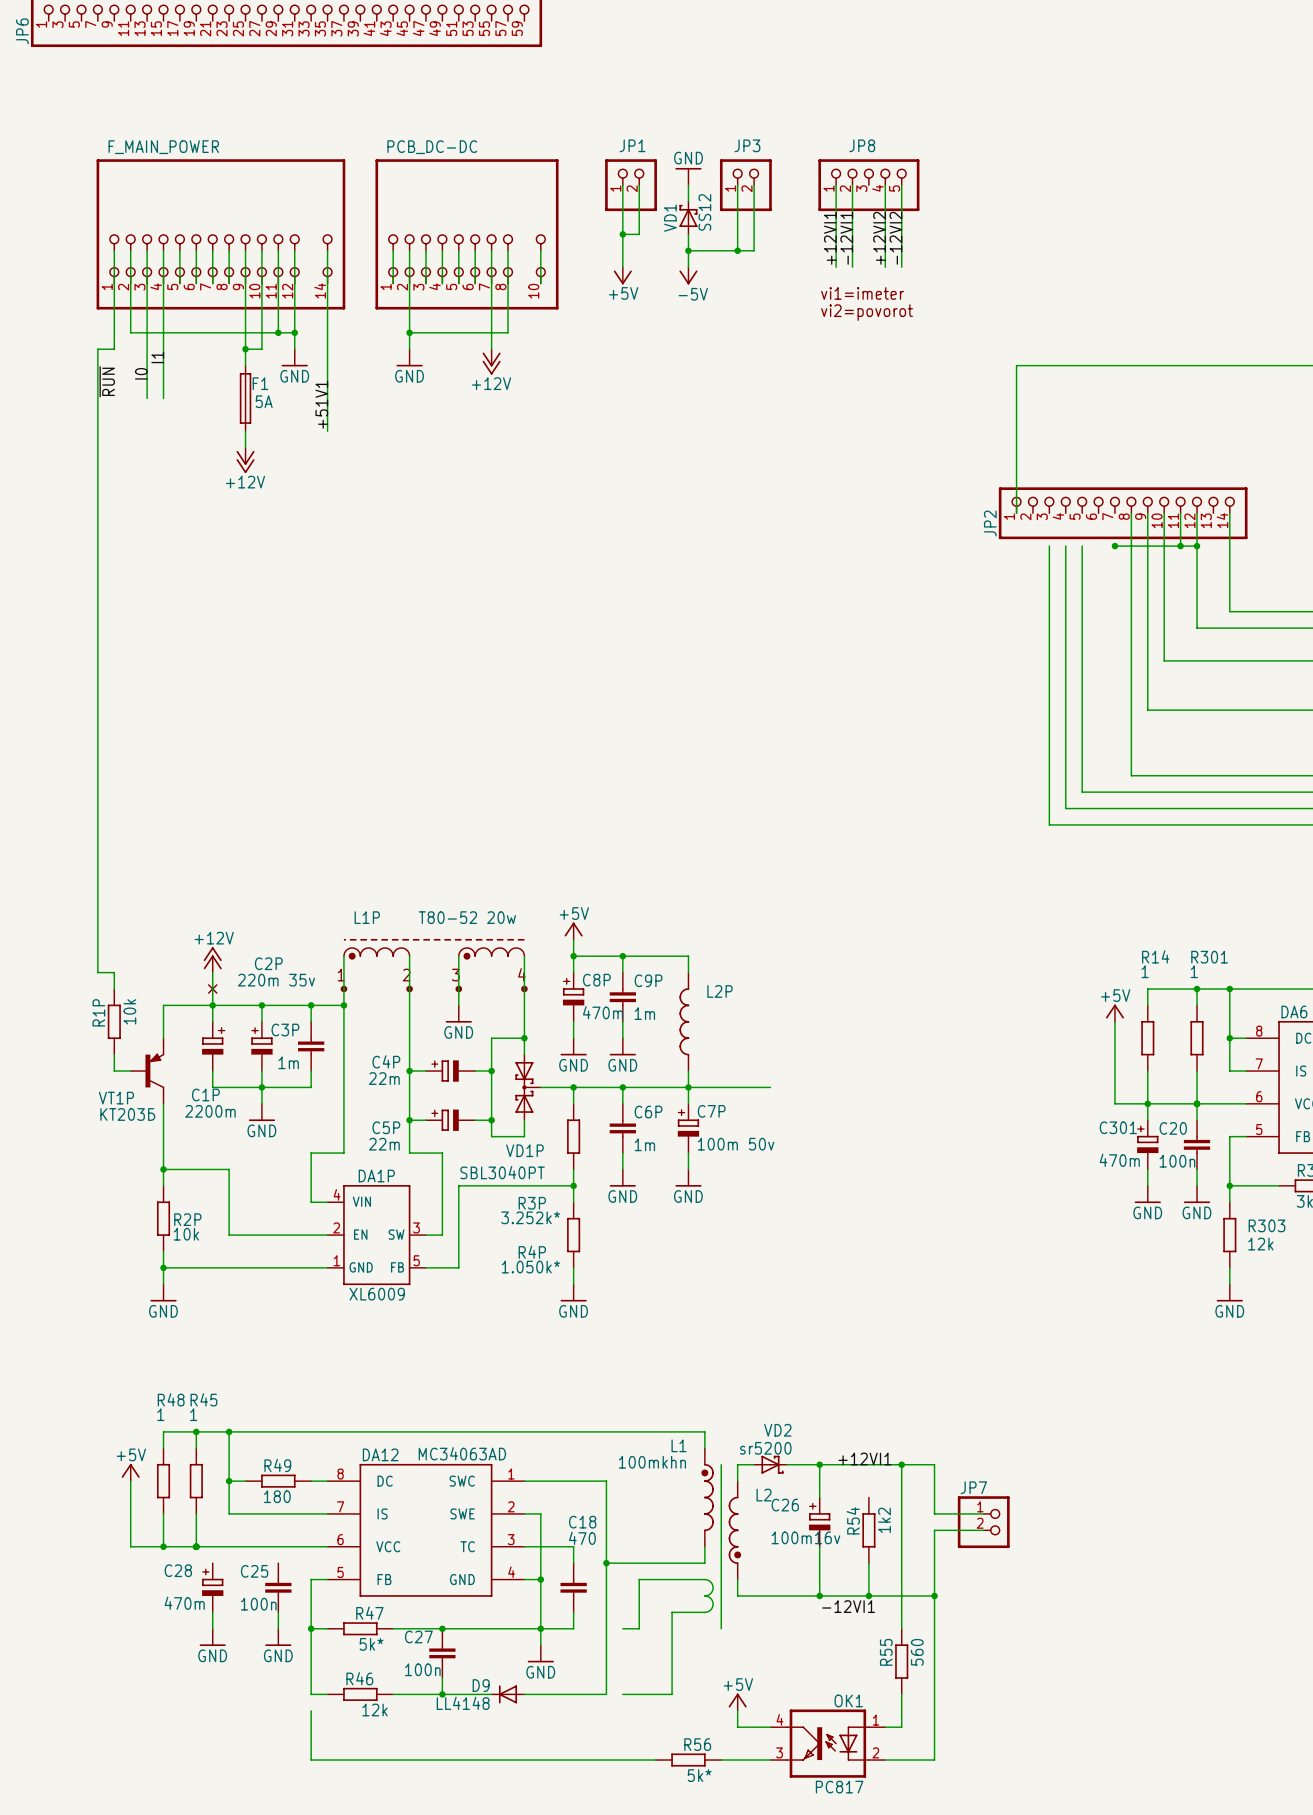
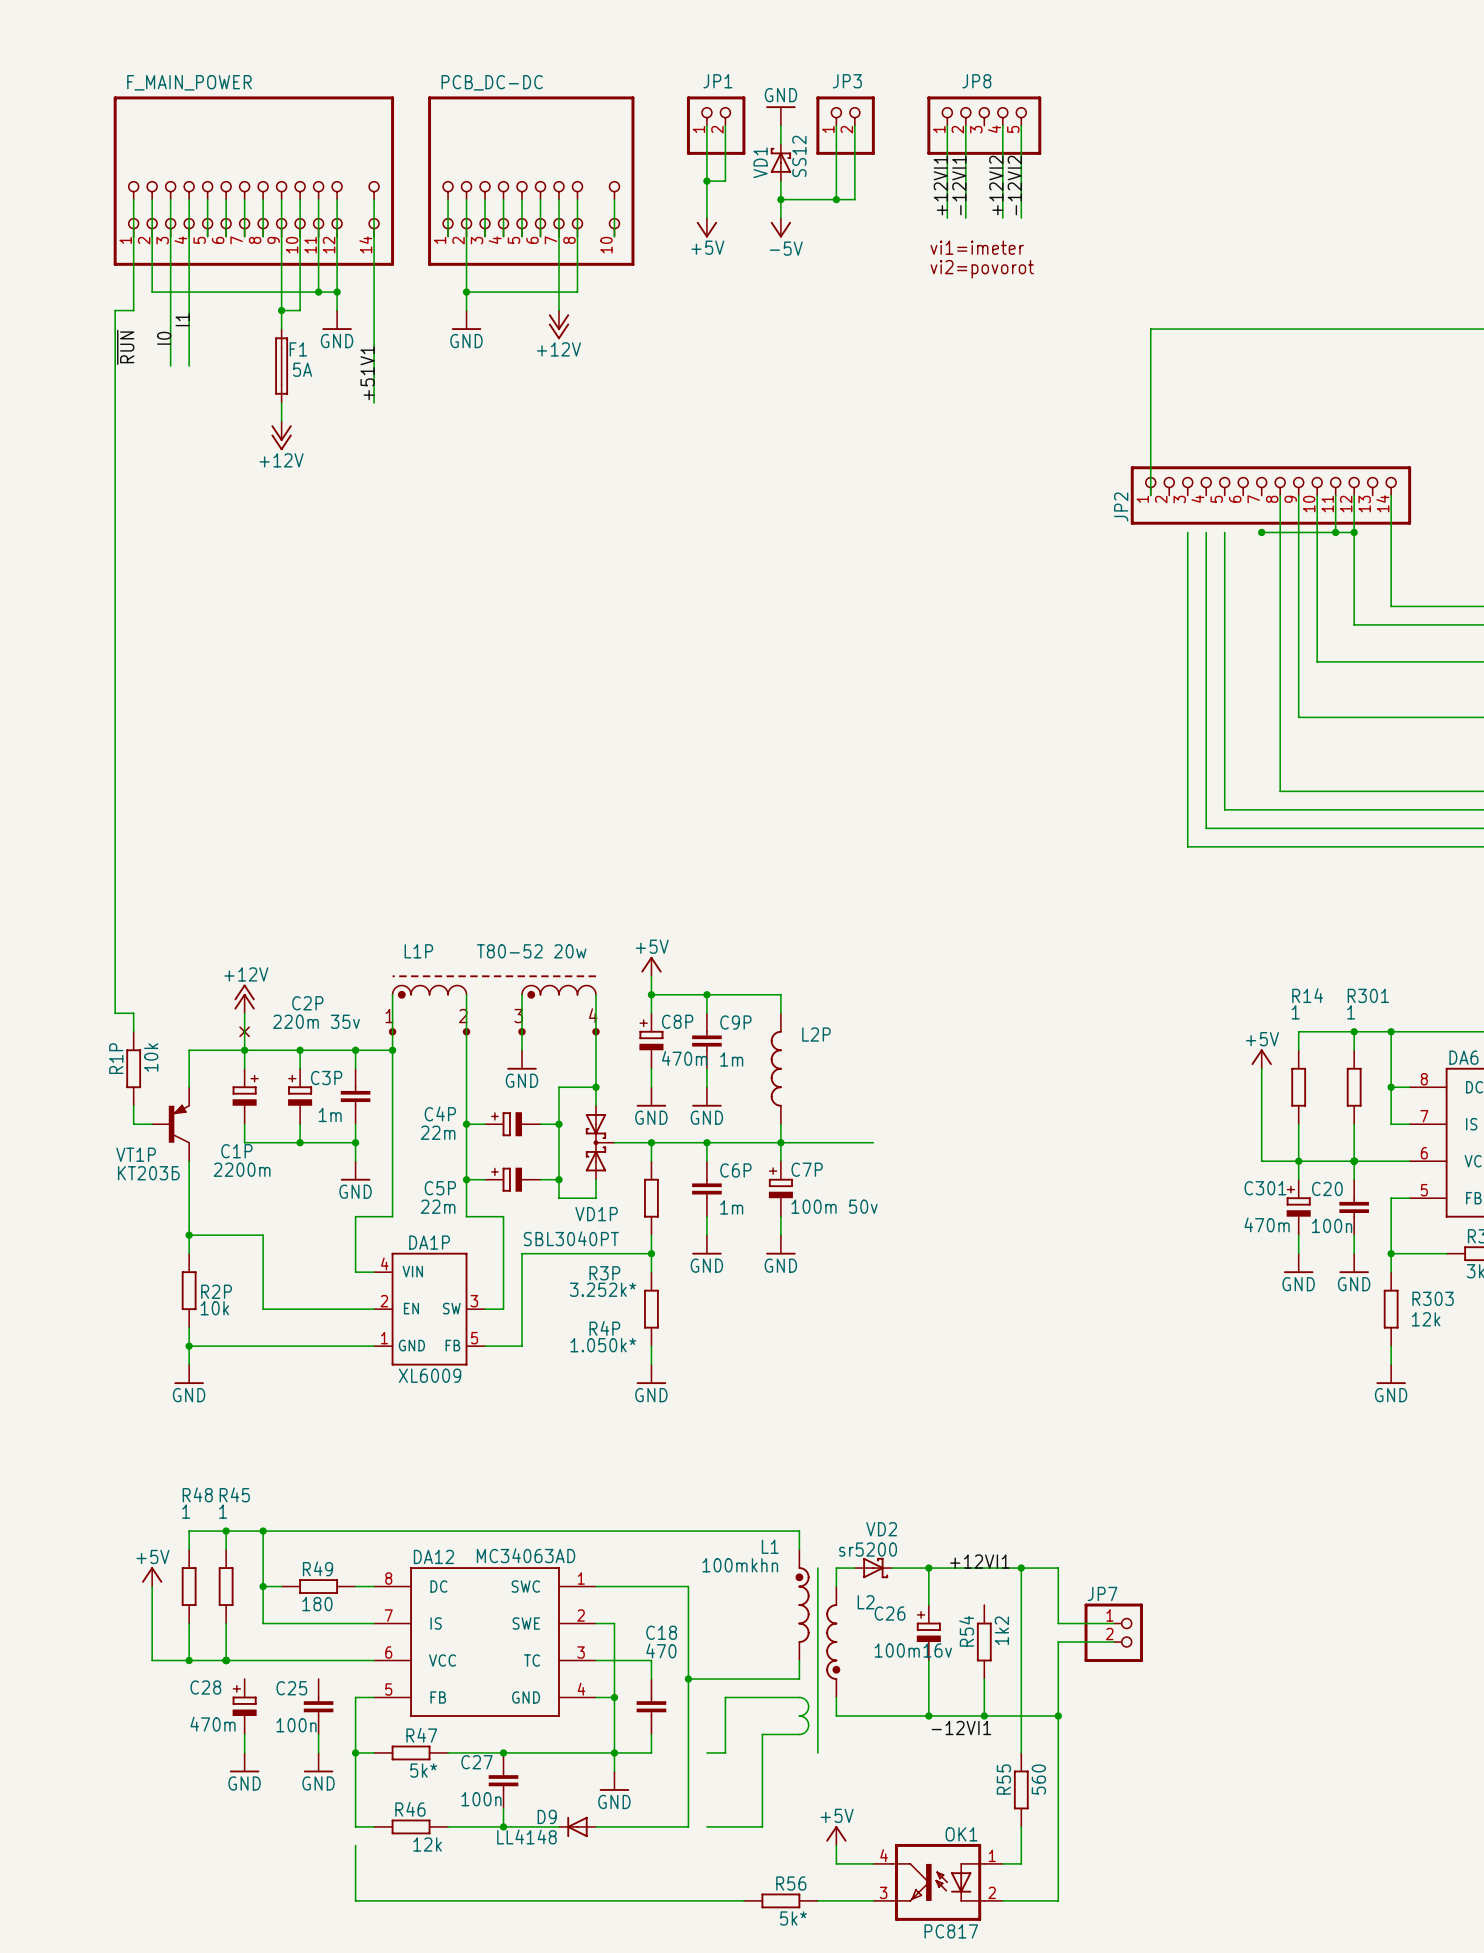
wire: (261, 1087) (261, 1103) -> (355, 1142) (355, 1161)
junction: none -> (355, 1142)
power symbol position: GND (261, 1112) -> GND (355, 1170)

